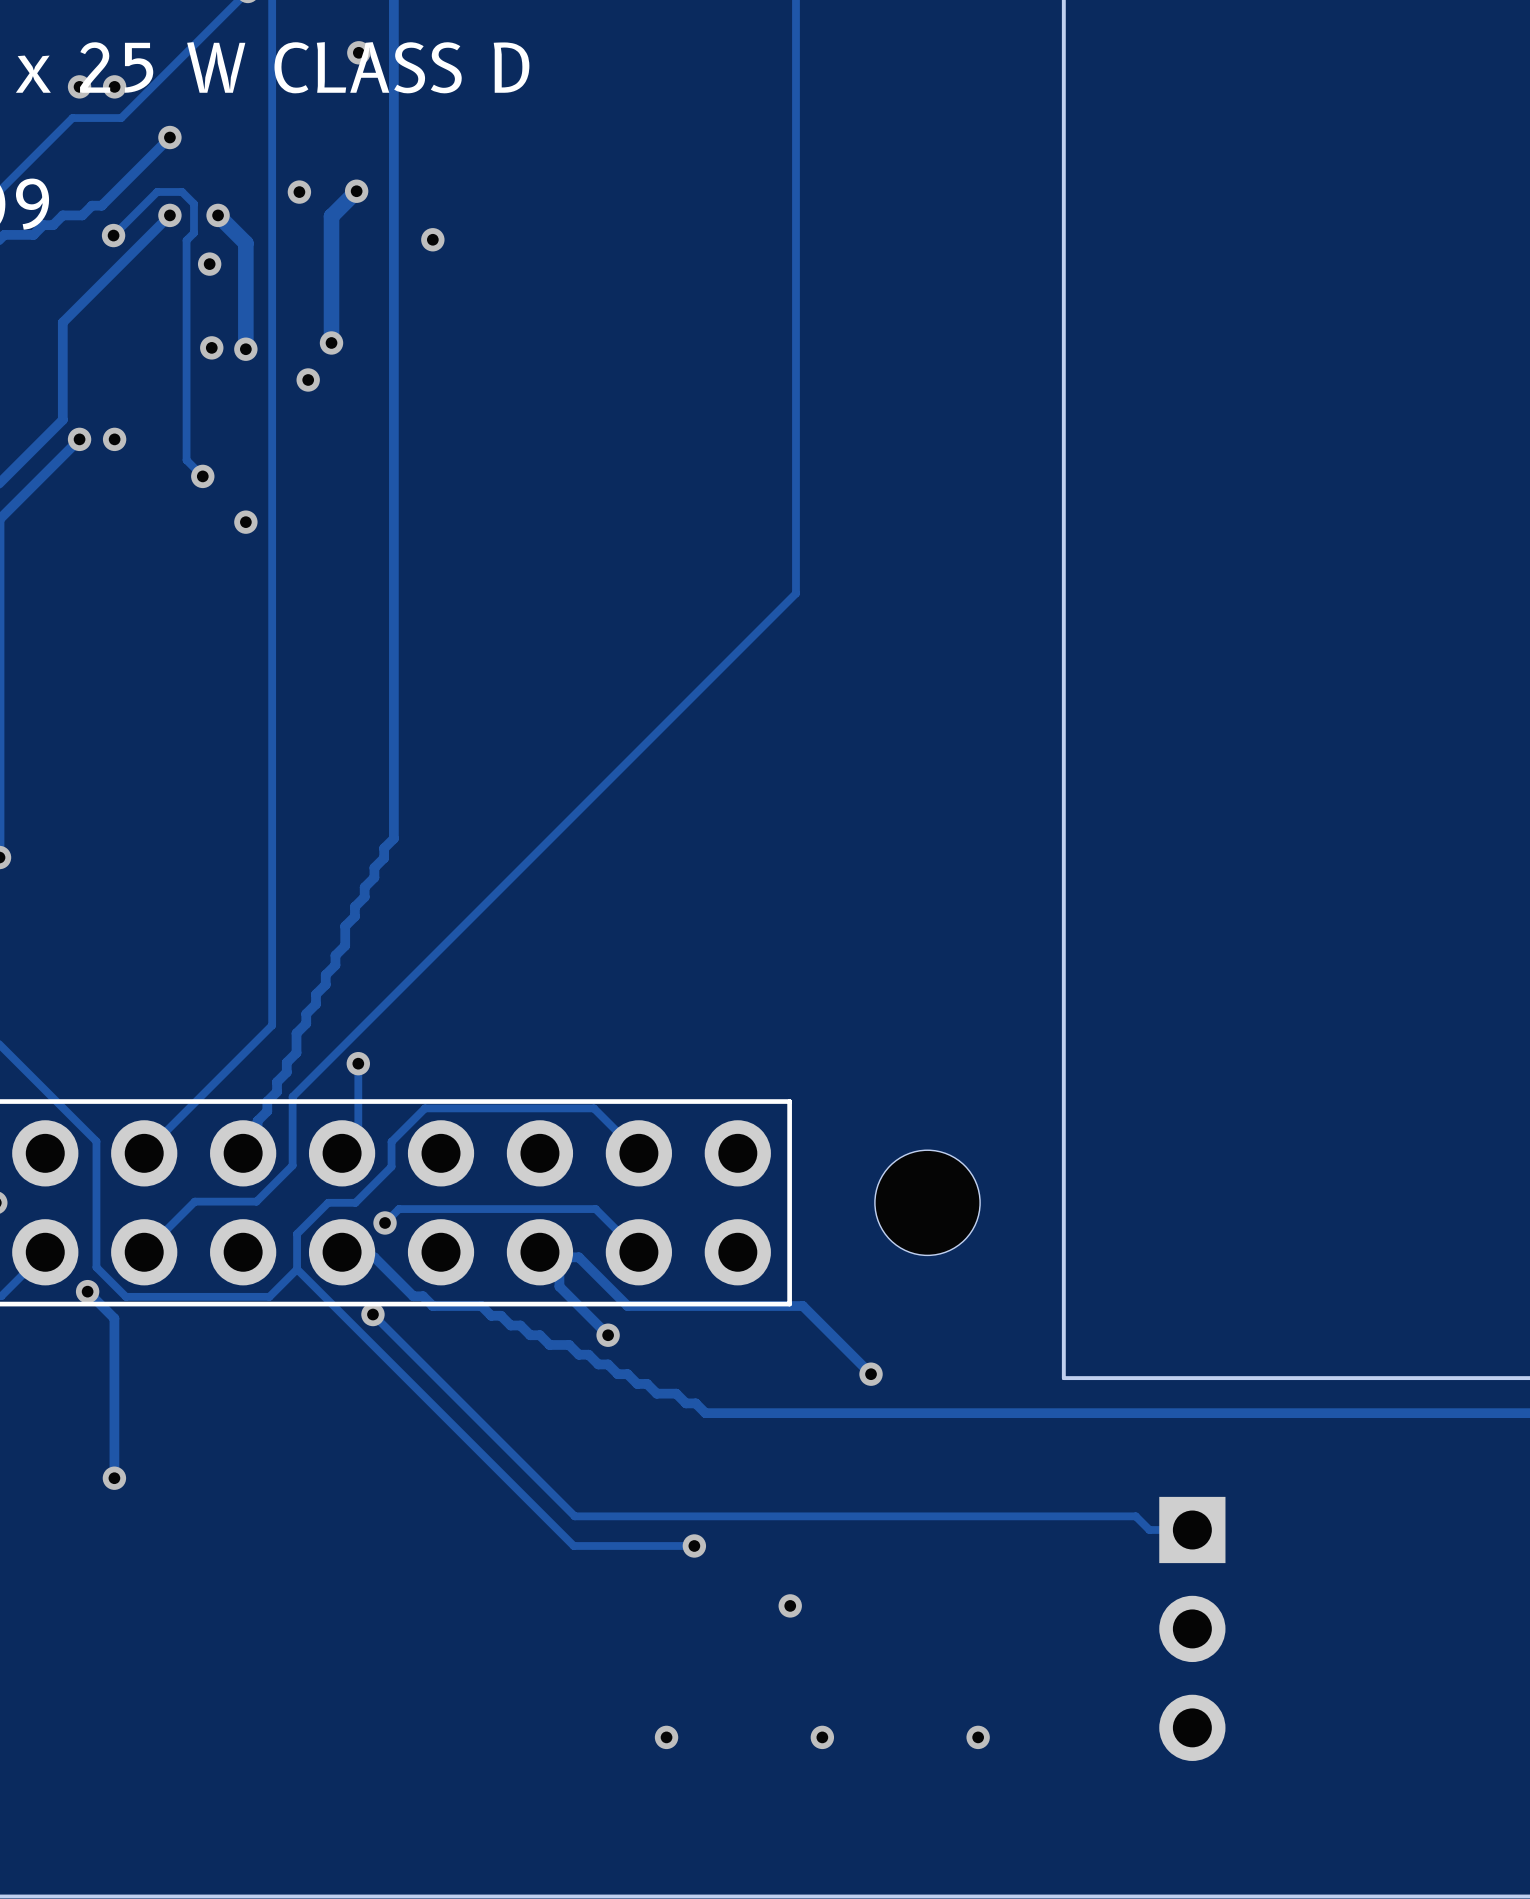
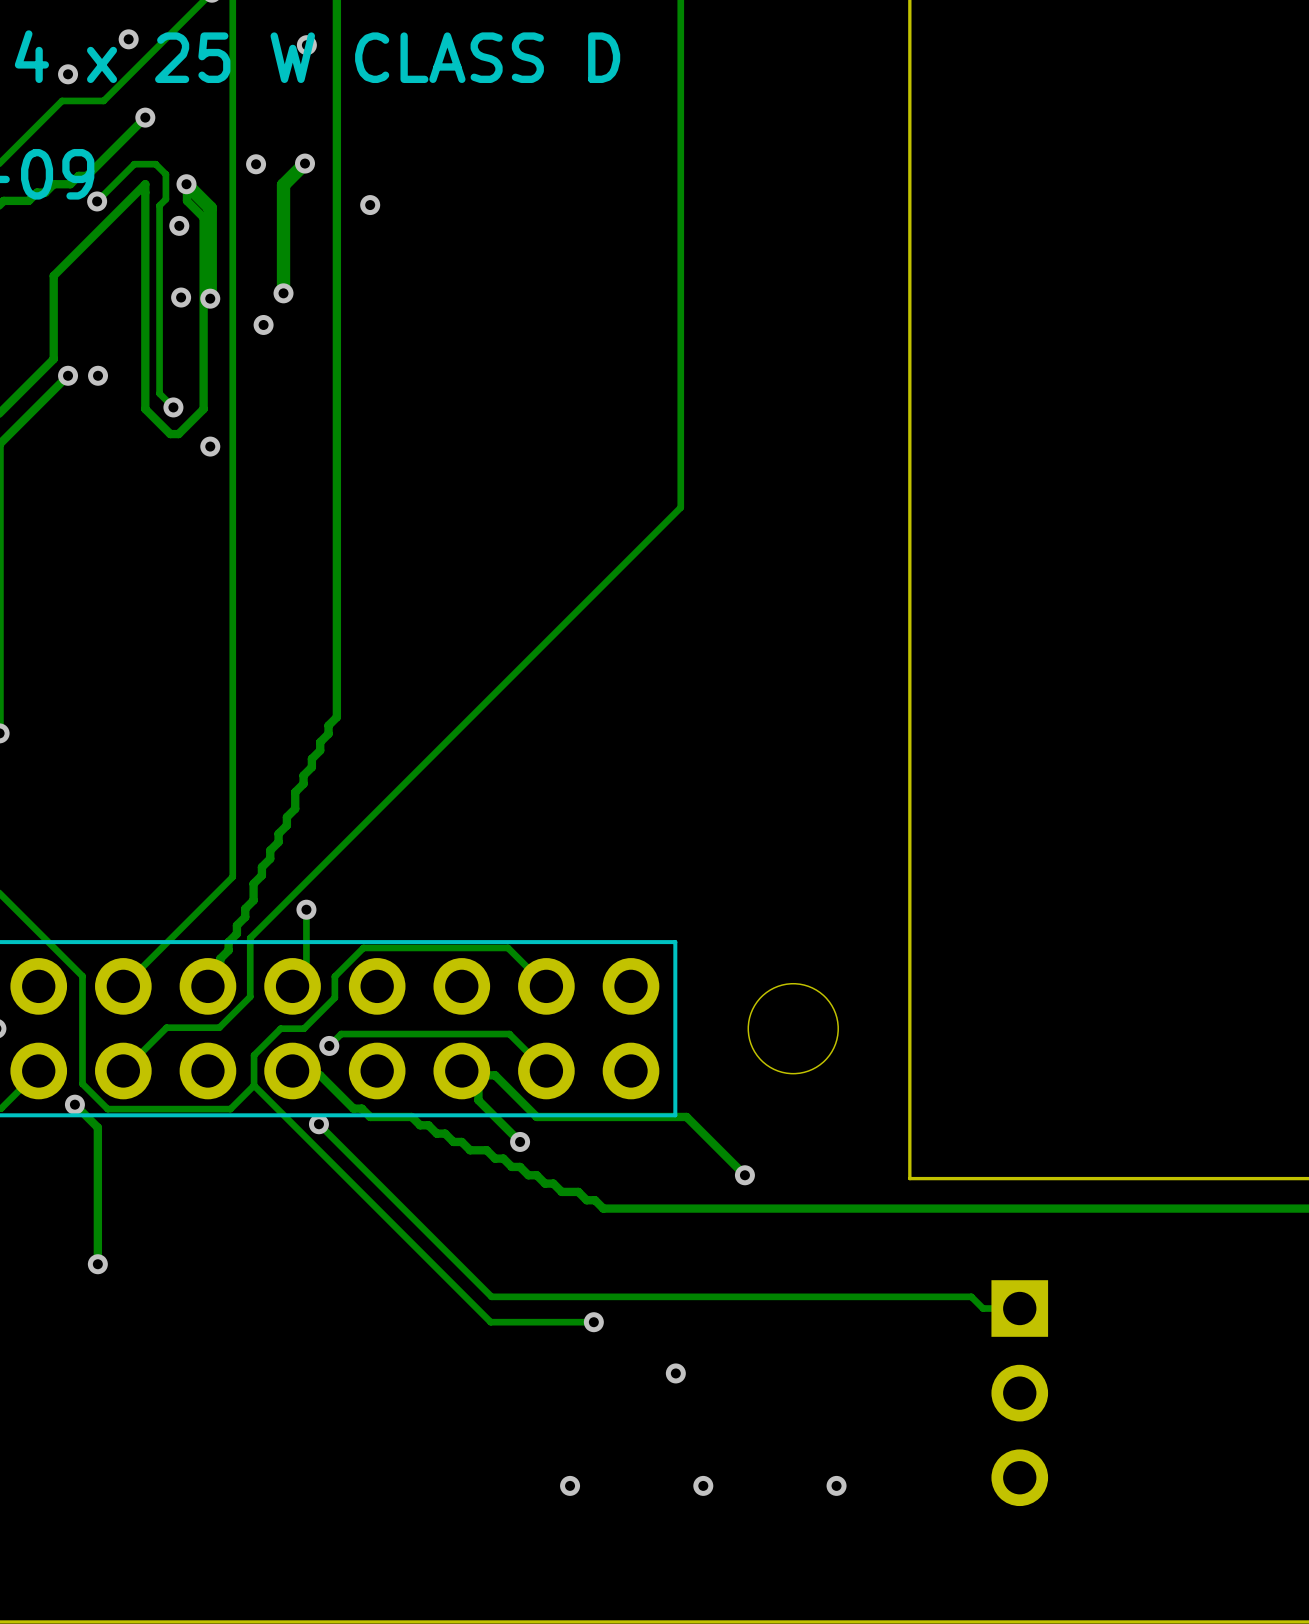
via position: (114, 86) -> (128, 39)
via: (169, 215) -> none
track: none -> (186, 184) (186, 200) (203, 217) (203, 409) (178, 434) (170, 434) (145, 409) (145, 184)

